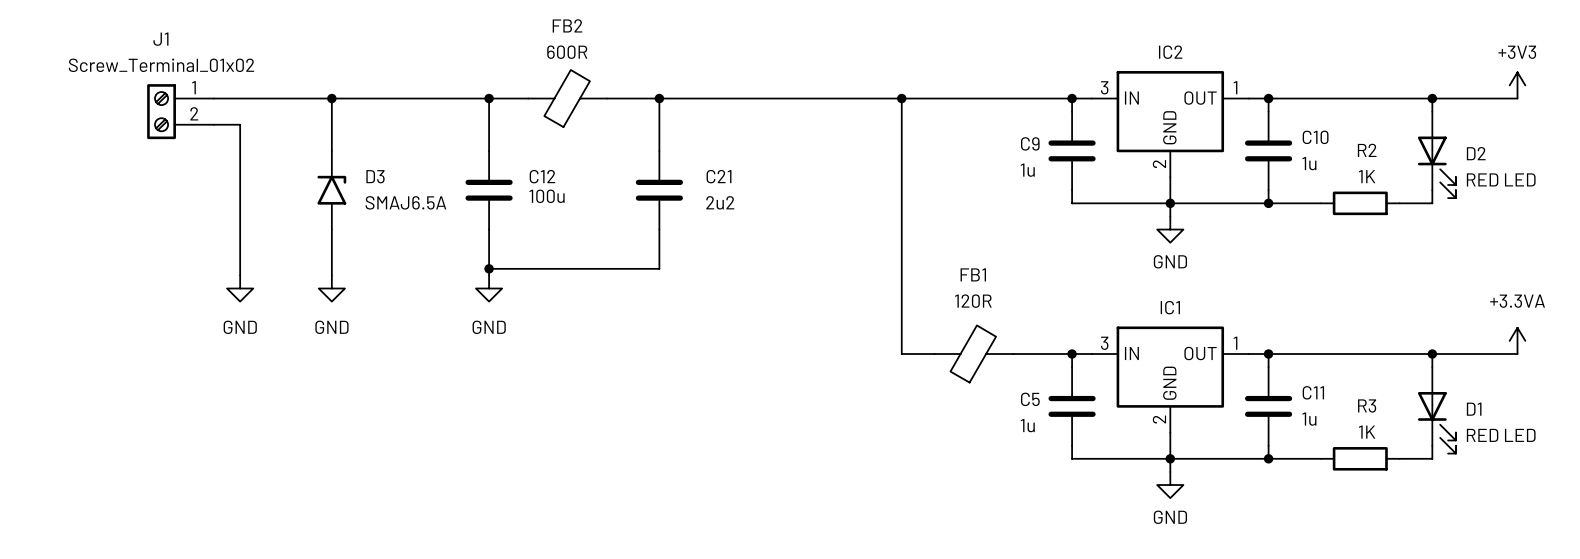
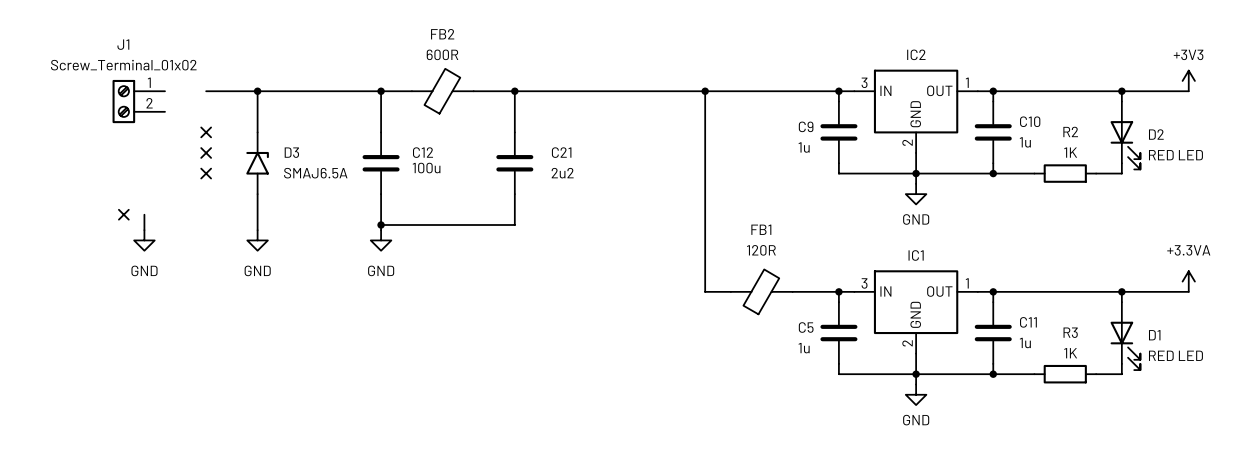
wire: (213, 98) (266, 98) -> none
wire: (213, 124) (240, 124) (240, 275) -> none
no-connect mark: none -> (206, 132)
no-connect mark: none -> (206, 152)
no-connect mark: none -> (206, 173)
no-connect mark: none -> (123, 214)
wire: none -> (144, 214) (144, 230)
power symbol position: GND (240, 288) -> GND (144, 240)

